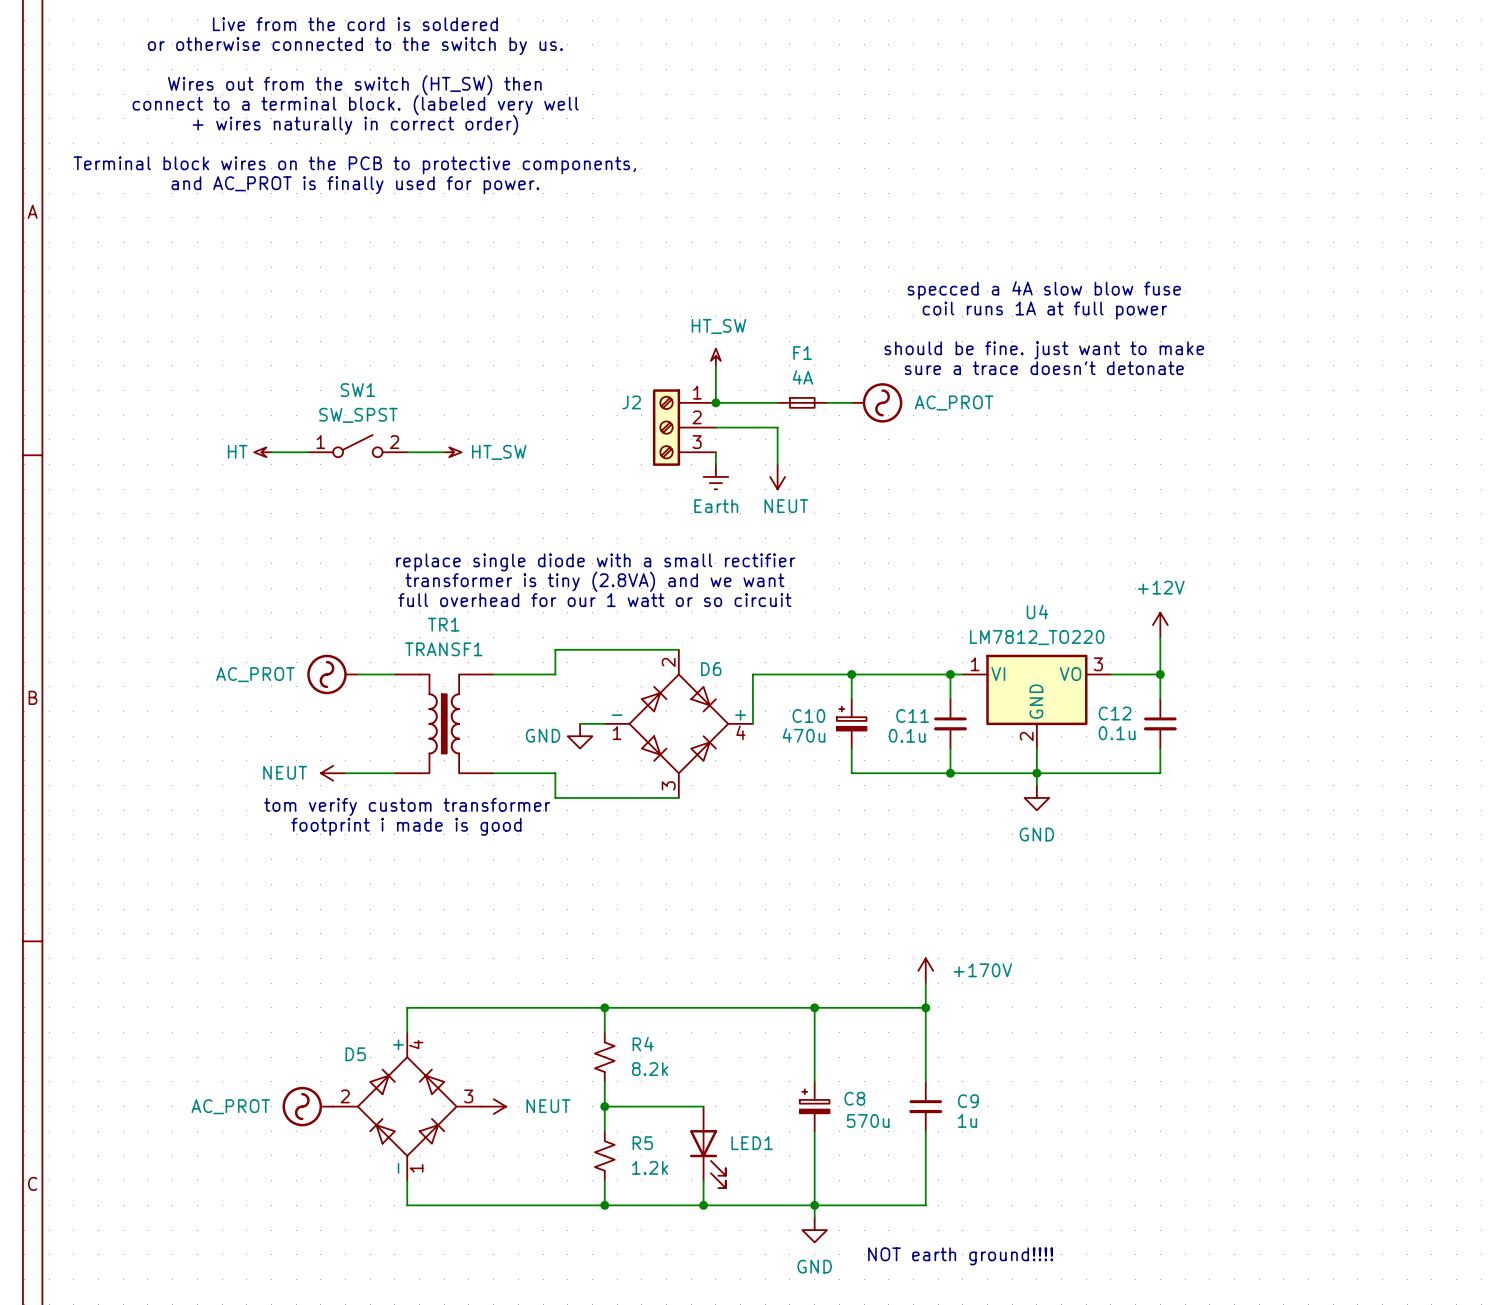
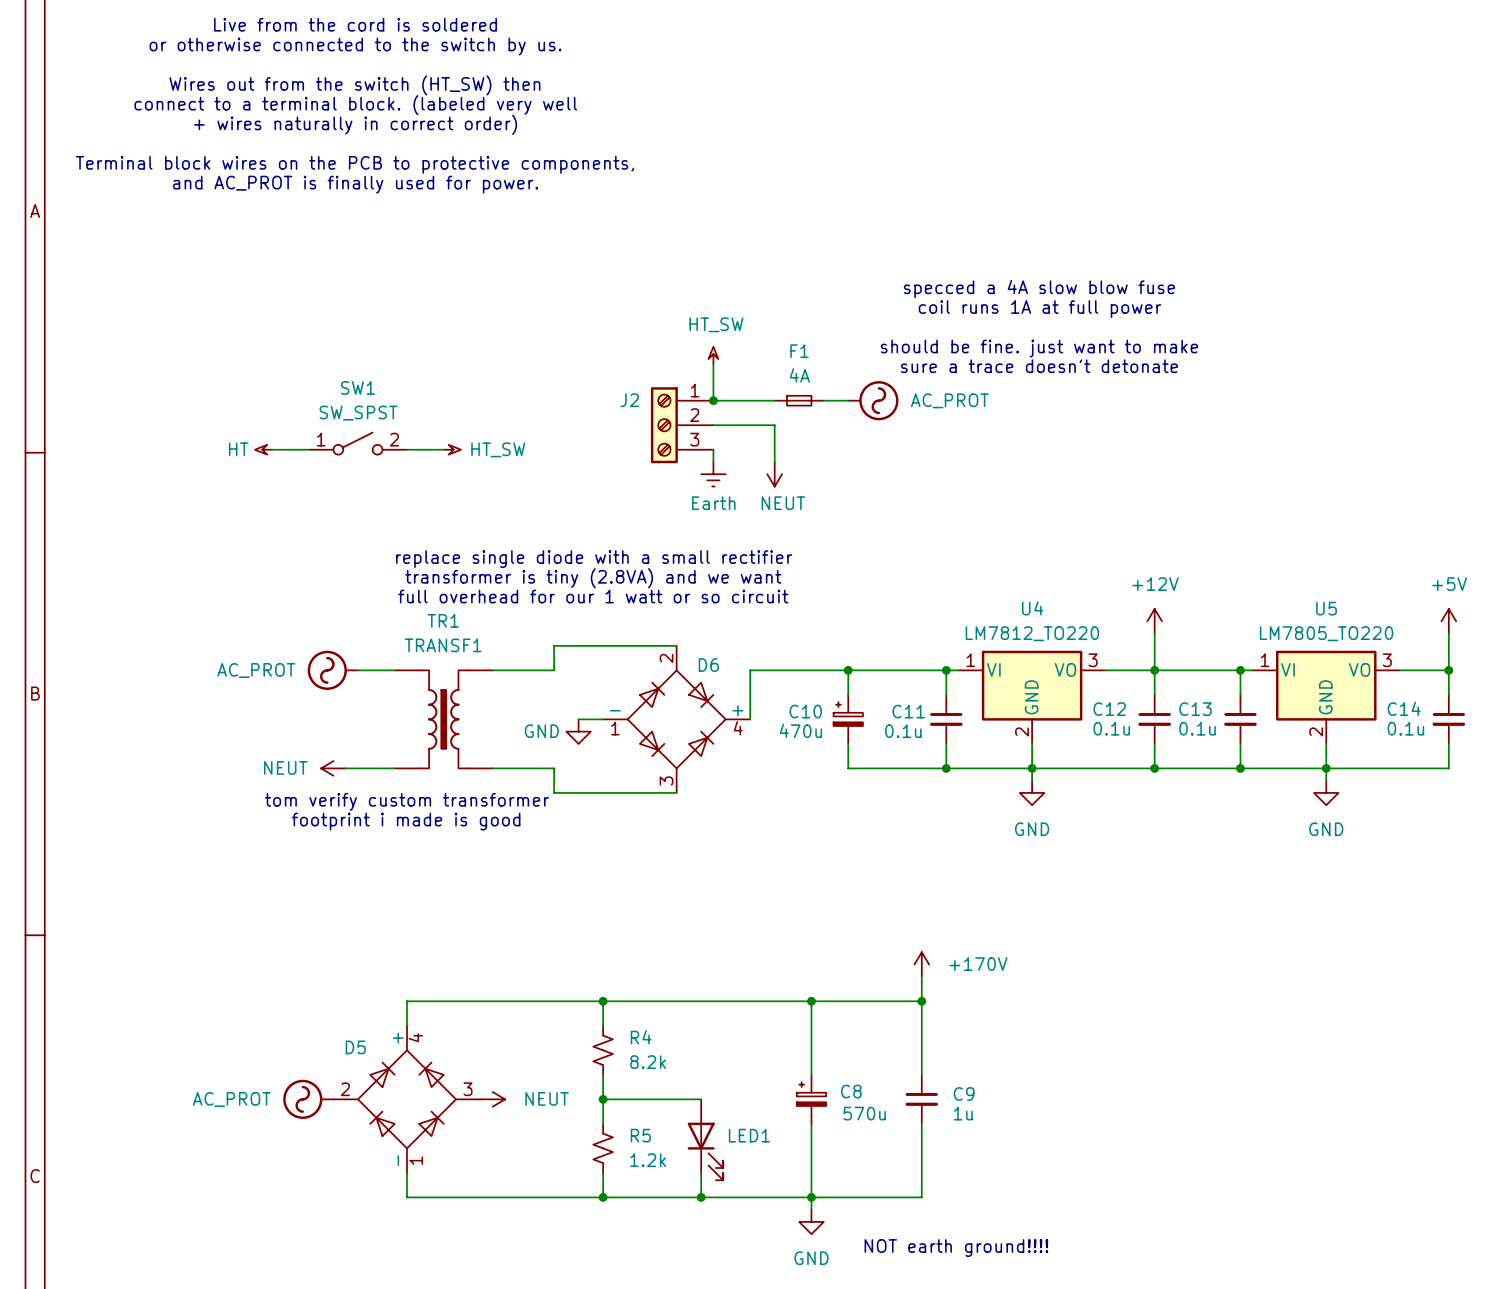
power symbol: none -> +5V (1448, 621)
wire: none -> (1448, 633) (1448, 694)
wire: none -> (1154, 670) (1252, 670)
wire: none -> (1240, 670) (1240, 694)
junction: none -> (1240, 670)
wire: none -> (1399, 670) (1448, 670)
junction: none -> (1448, 670)
U5: none -> LM7805_TO220 (1326, 697)
C13: none -> 0.1u (1240, 719)
C14: none -> 0.1u (1448, 719)
wire: none -> (1240, 743) (1240, 768)
wire: none -> (1326, 743) (1326, 780)
wire: none -> (1448, 743) (1448, 768) (1154, 768)
junction: none -> (1154, 768)
junction: none -> (1240, 768)
junction: none -> (1326, 768)
power symbol: none -> GND (1326, 792)

